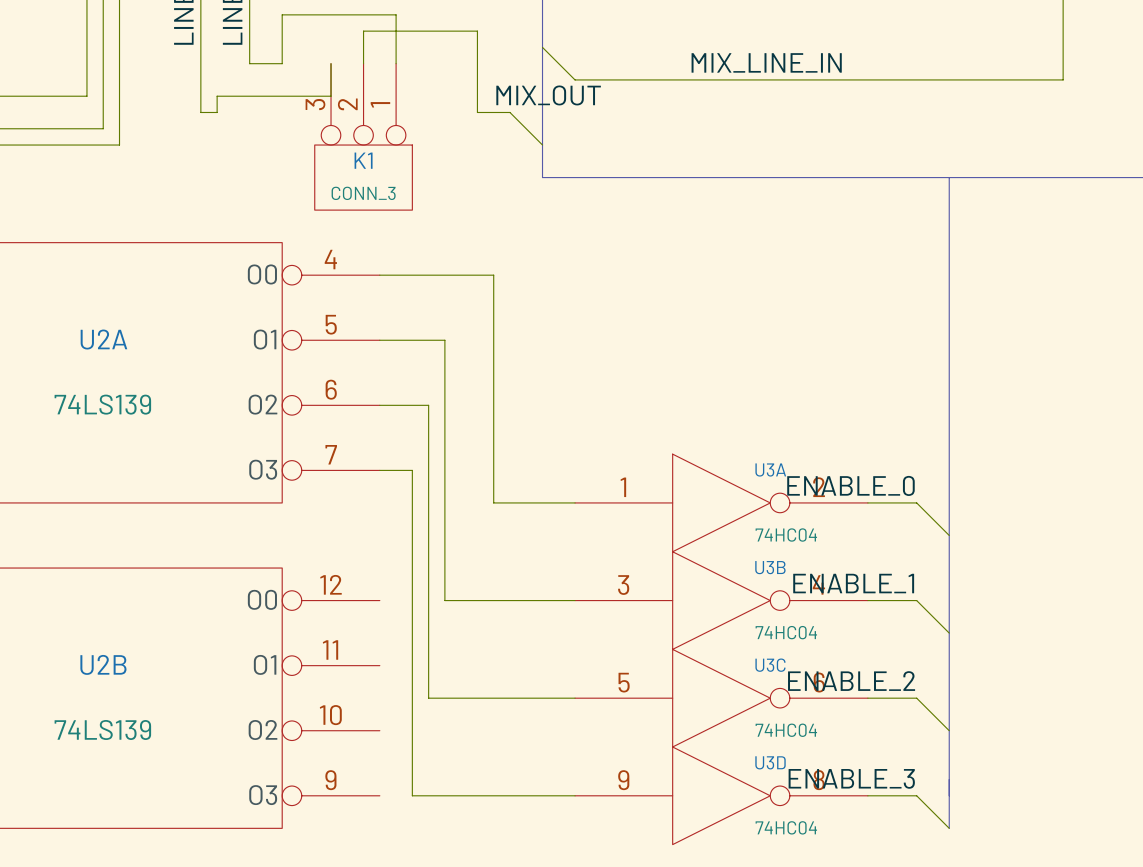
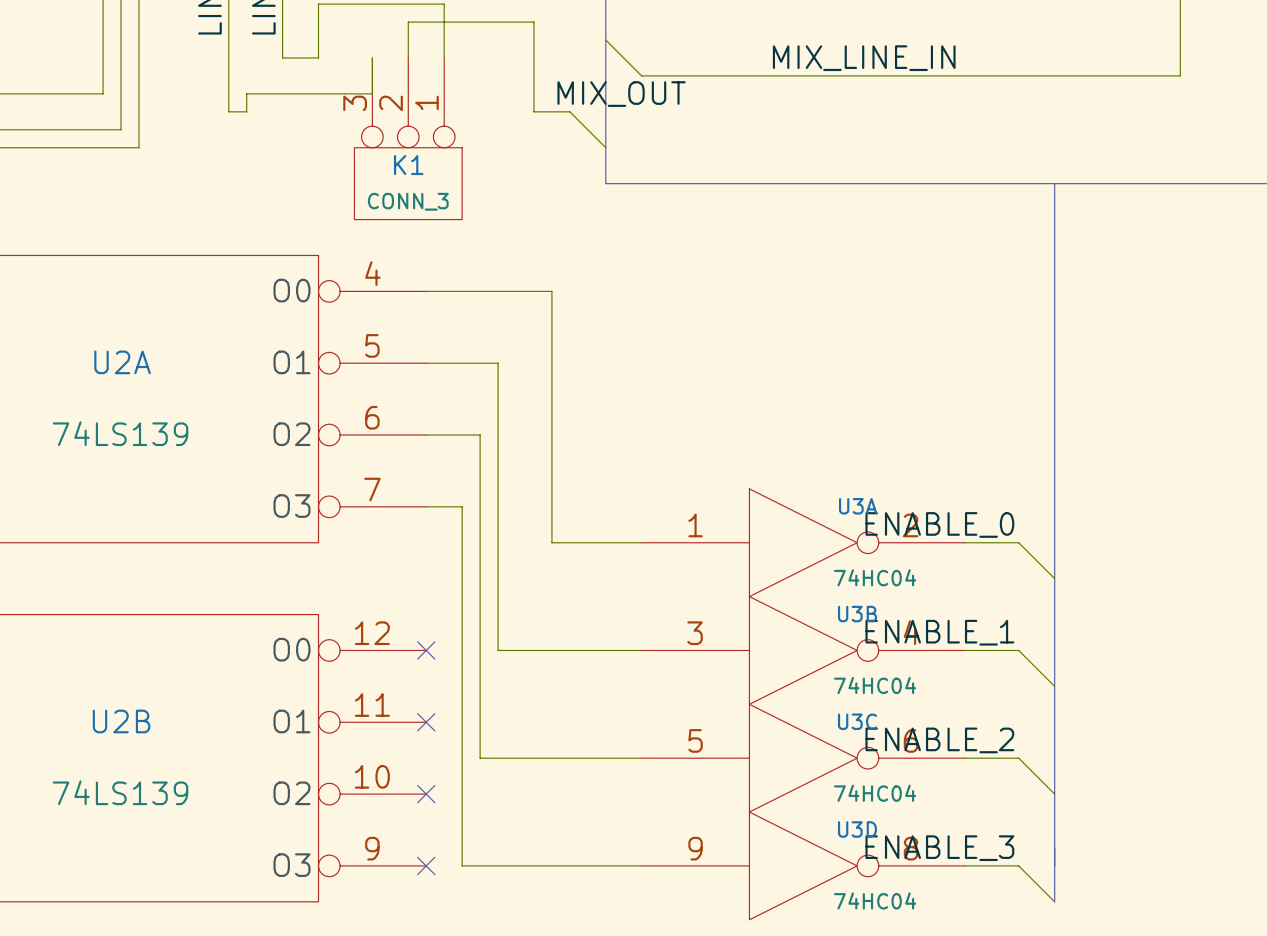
no-connect mark: none -> (426, 650)
no-connect mark: none -> (426, 722)
no-connect mark: none -> (426, 794)
no-connect mark: none -> (426, 865)

